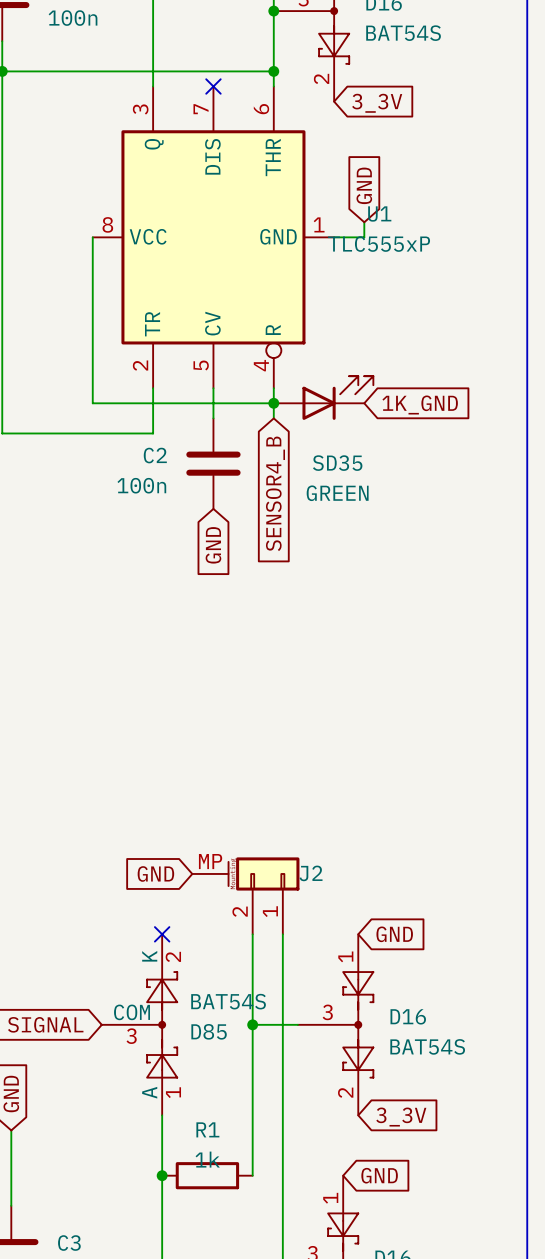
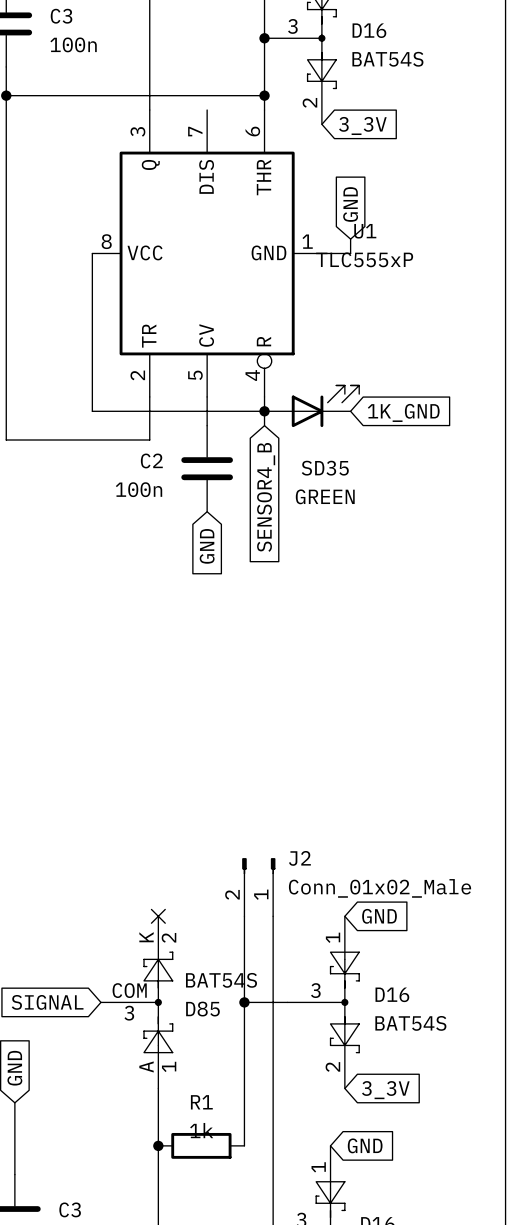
no-connect mark: (213, 86) -> none
J2 symbol: [192, 857, 300, 935] -> [242, 858, 276, 917]
global label: GND (155, 873) -> none
J2 value: none -> Conn_01x02_Male (380, 888)

